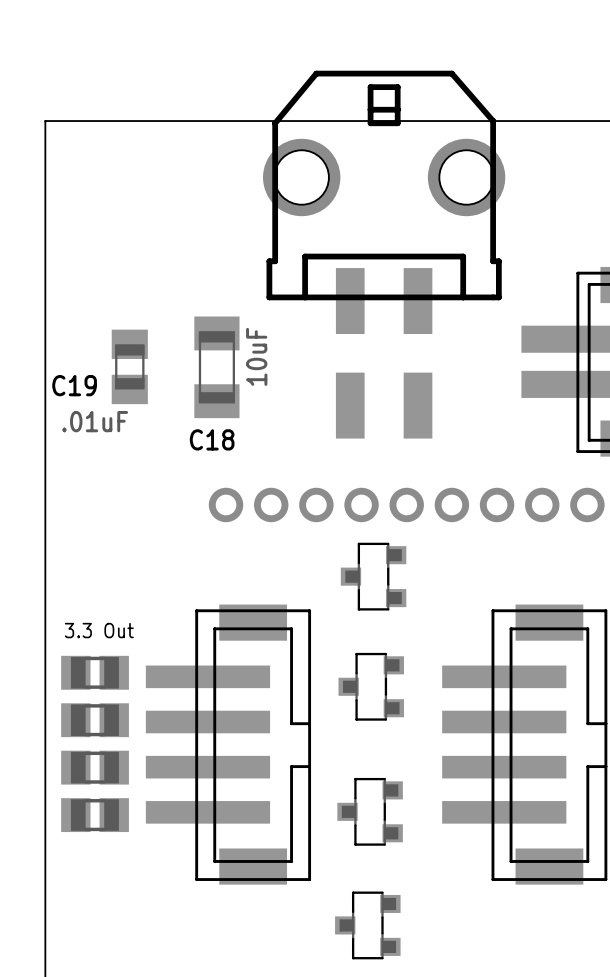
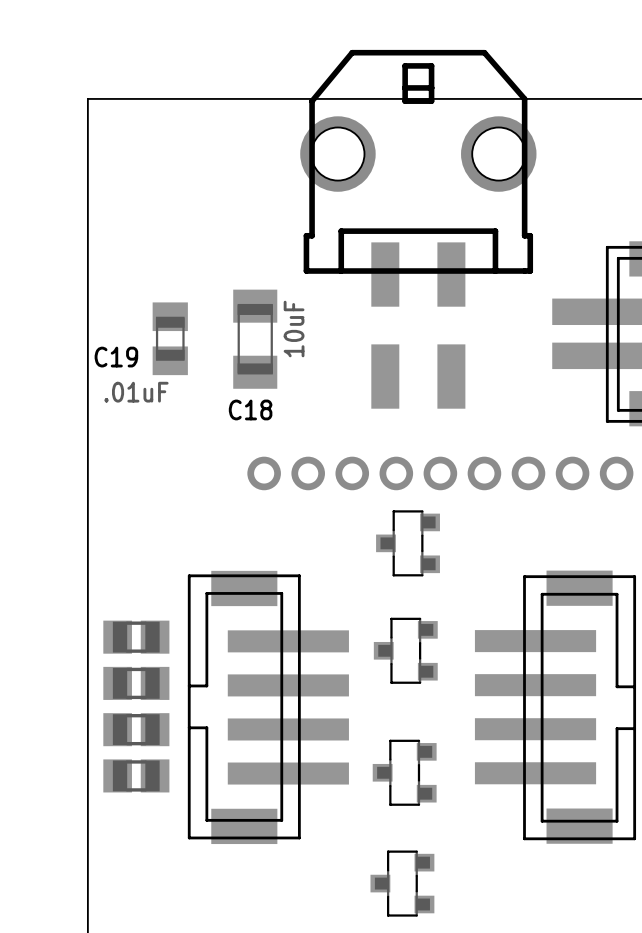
text: 3.3 Out (99, 630) -> none
part rotation: 0° (228, 744) -> 180° (268, 707)

